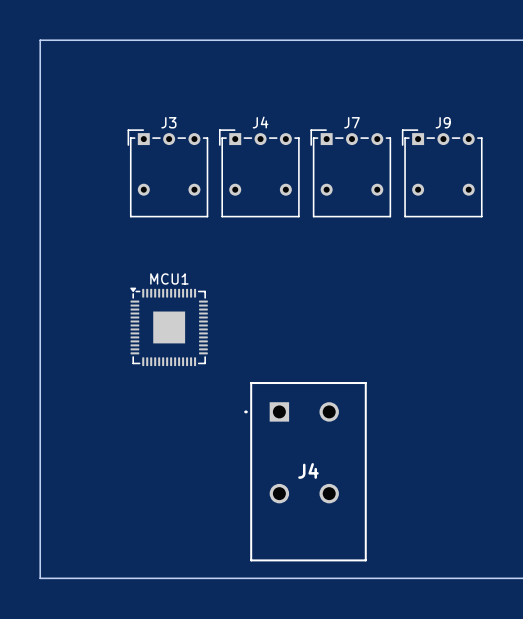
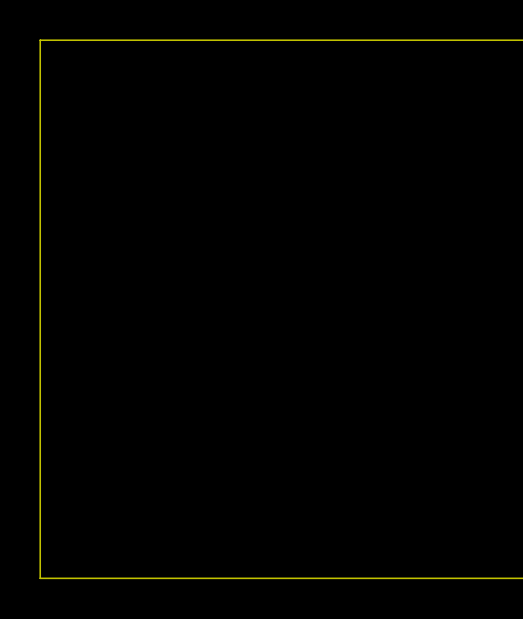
J3: (167, 173) -> none
J4: (259, 173) -> none
J7: (350, 173) -> none
J9: (442, 173) -> none
MCU1: (168, 326) -> none
J4: (305, 471) -> none

